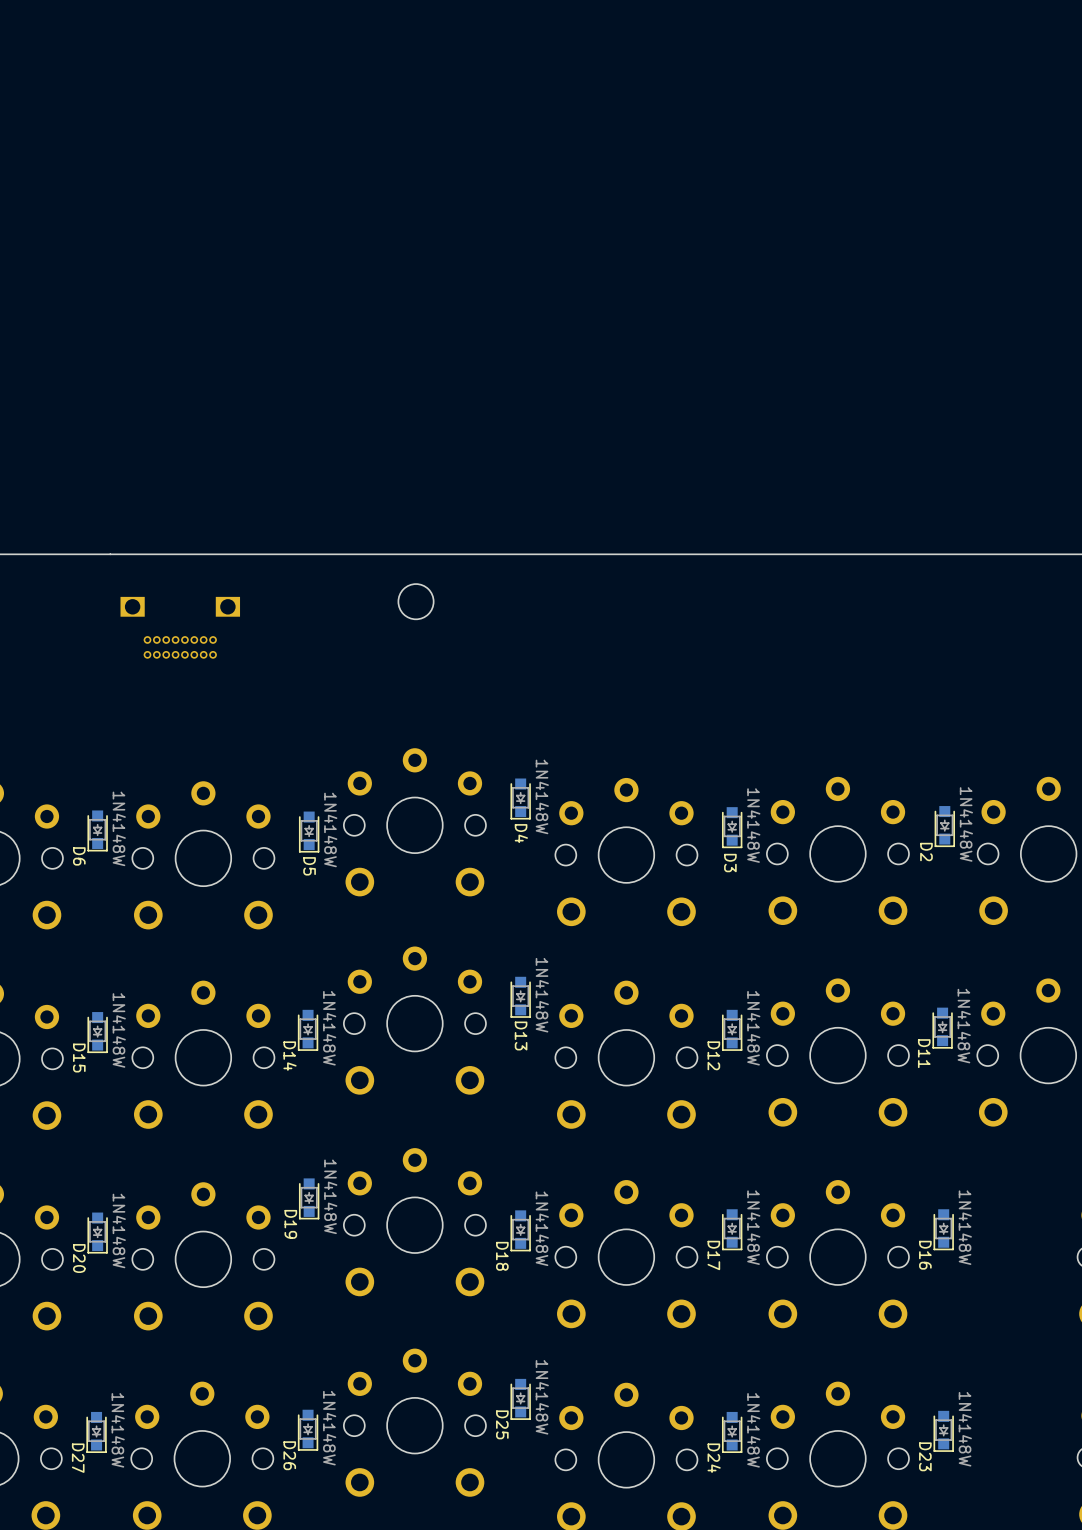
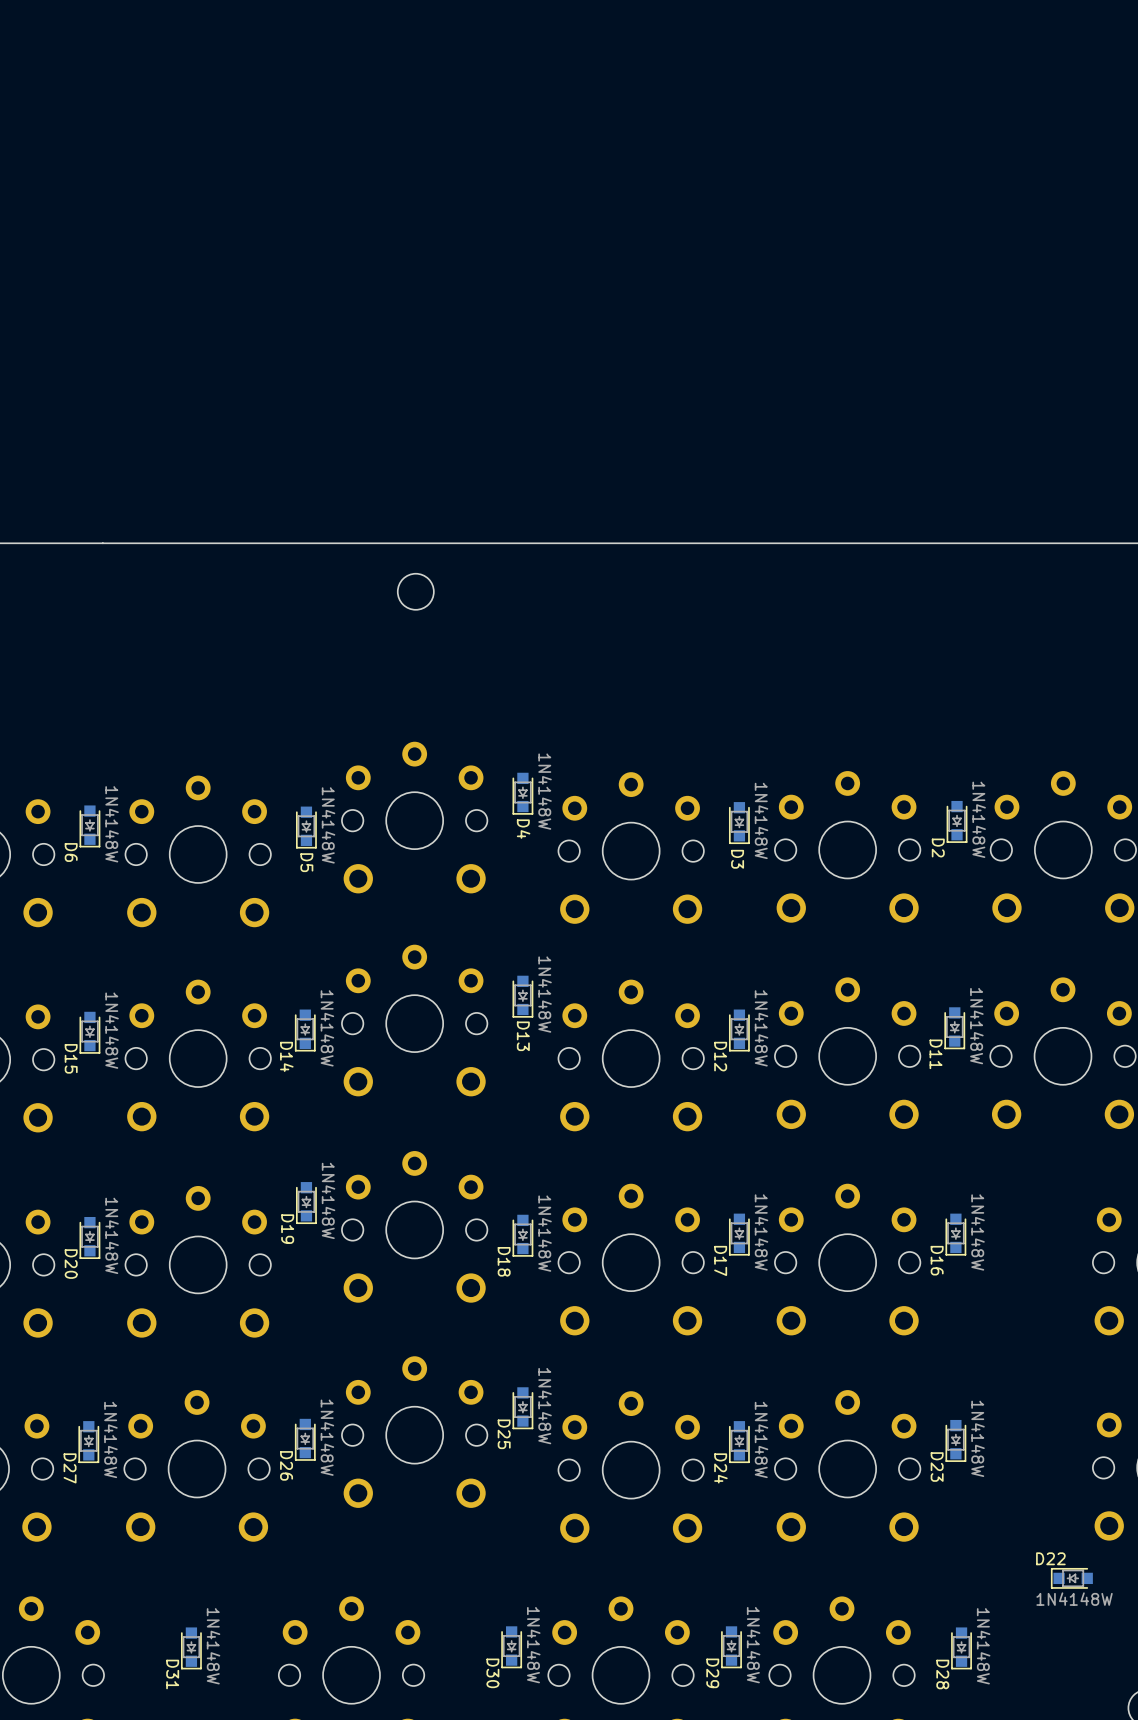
part: (180, 627) -> none

